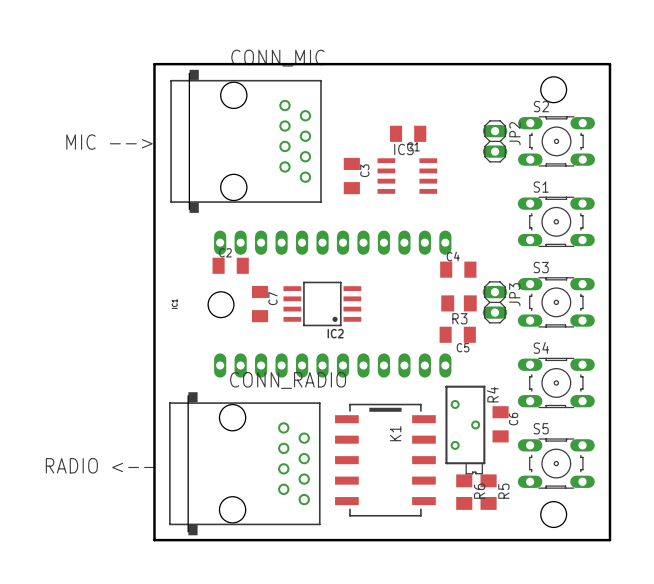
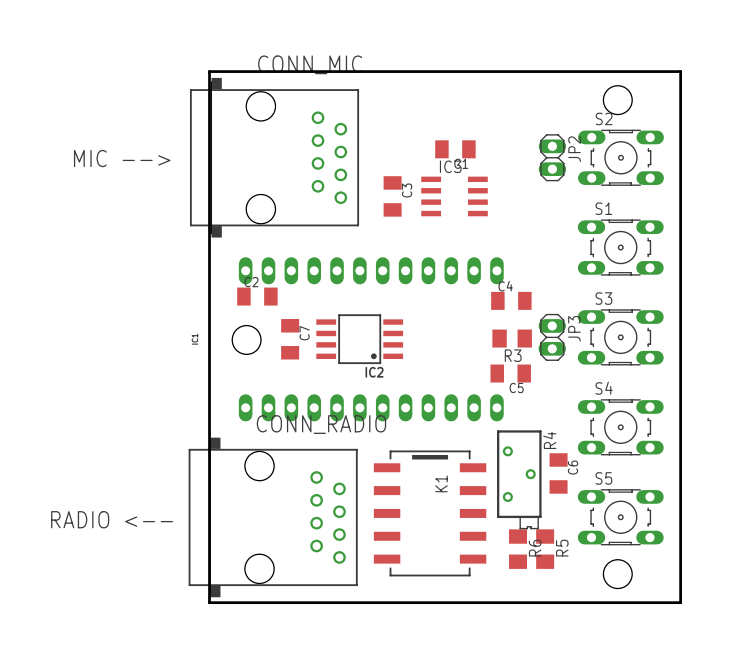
board edge: (187, 64) (154, 64) (154, 540) (187, 540) -> (209, 71) (209, 602)

